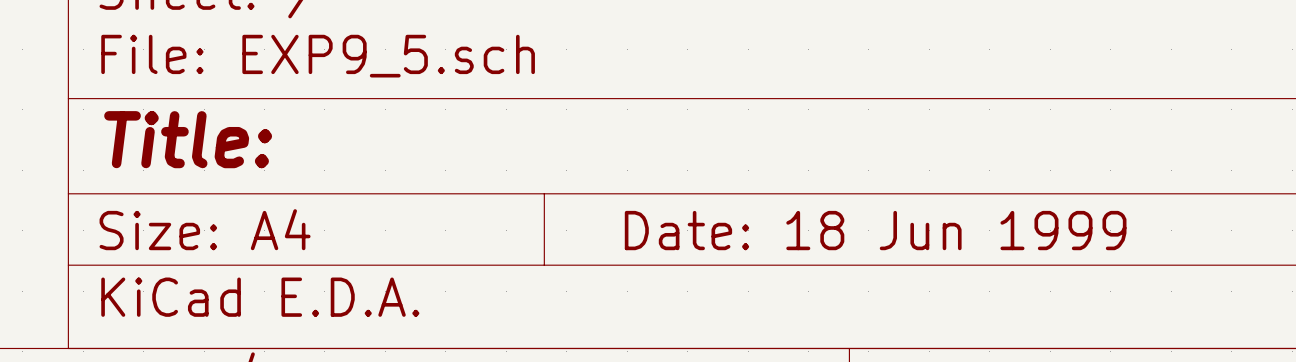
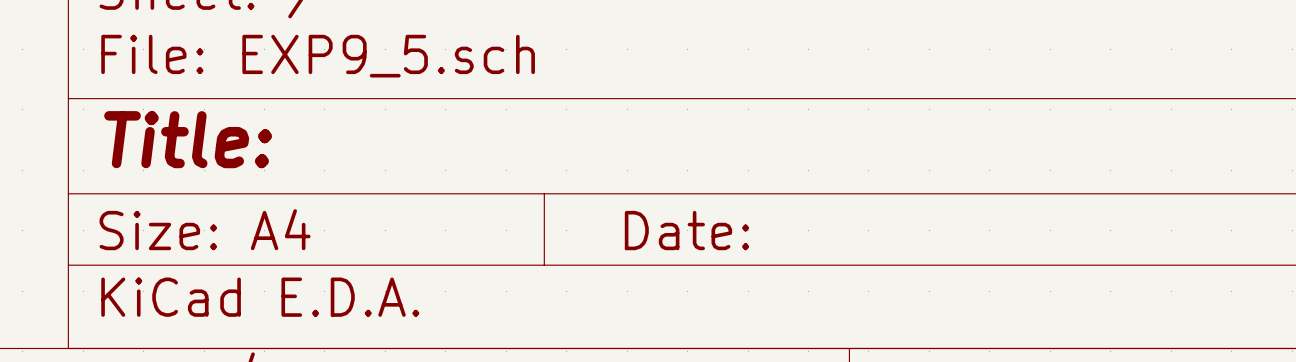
title block: Date: 18 Jun 1999 (875, 230) -> Date: (686, 230)

